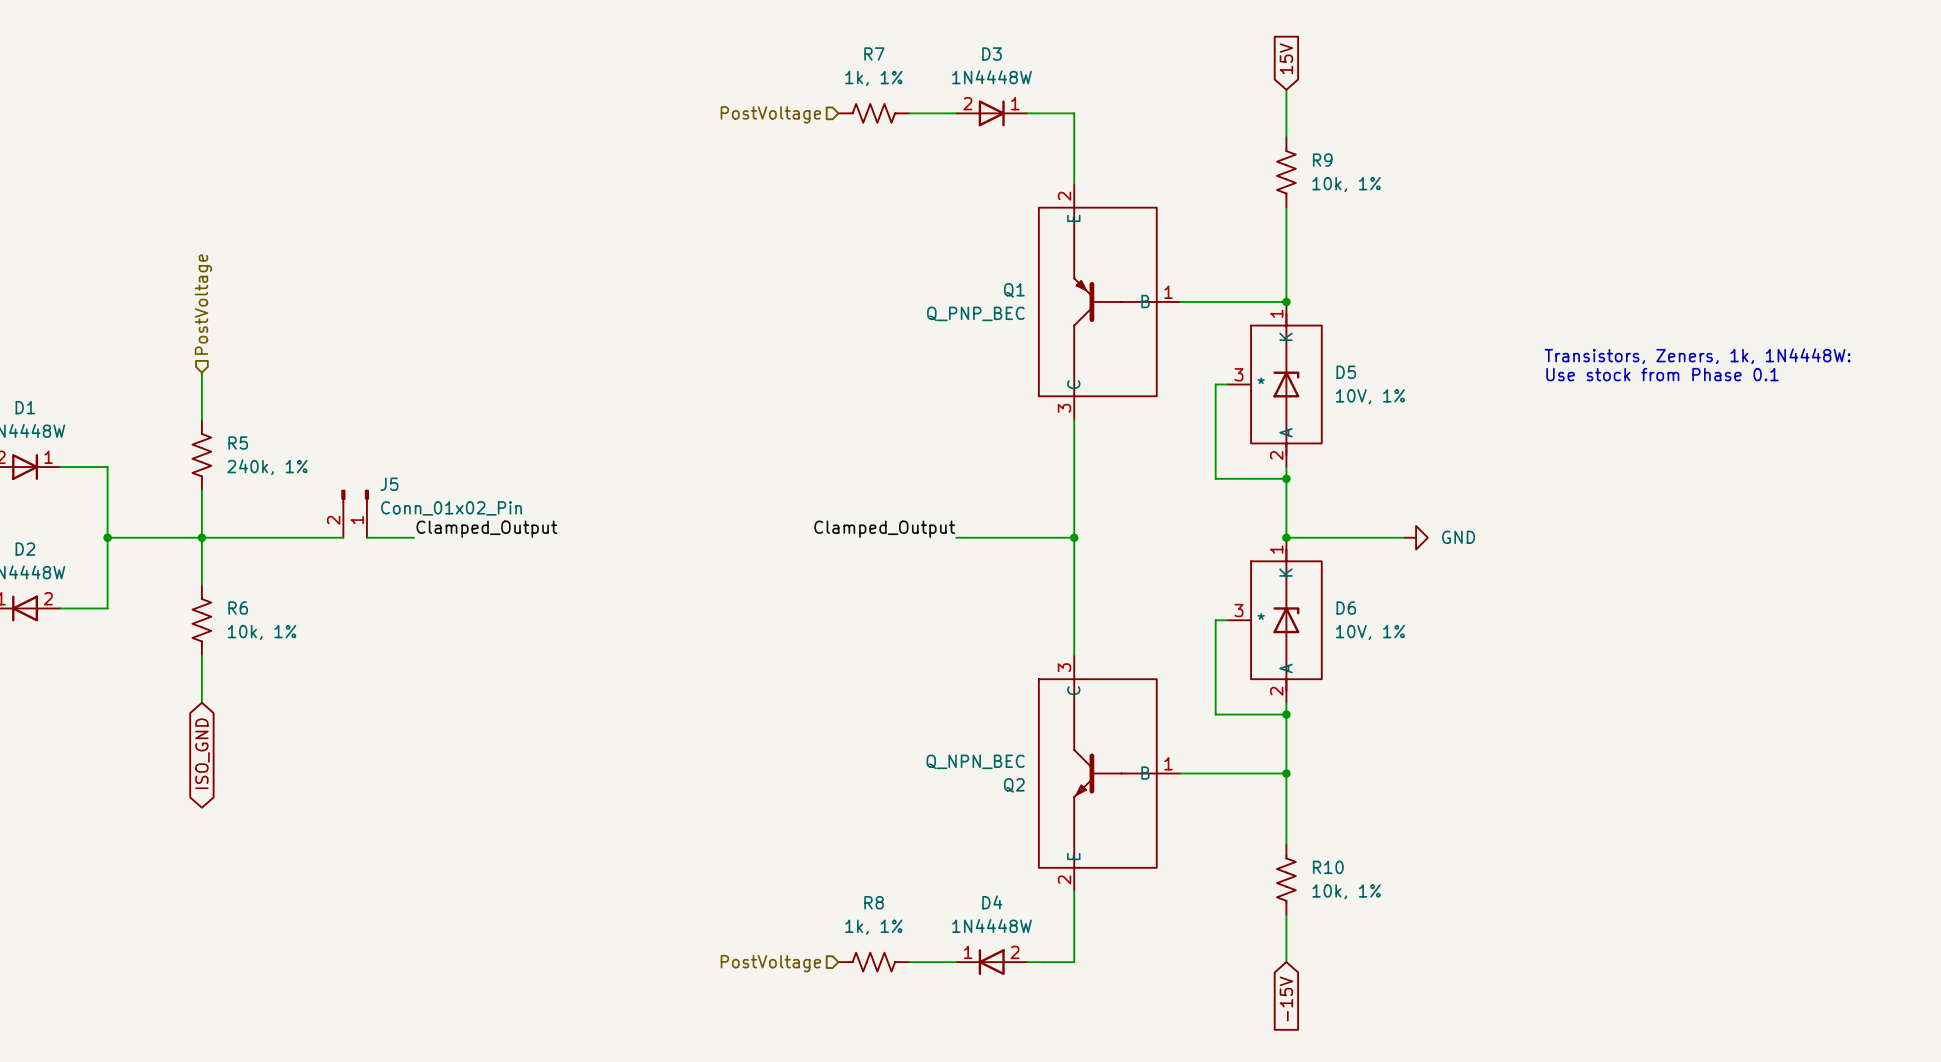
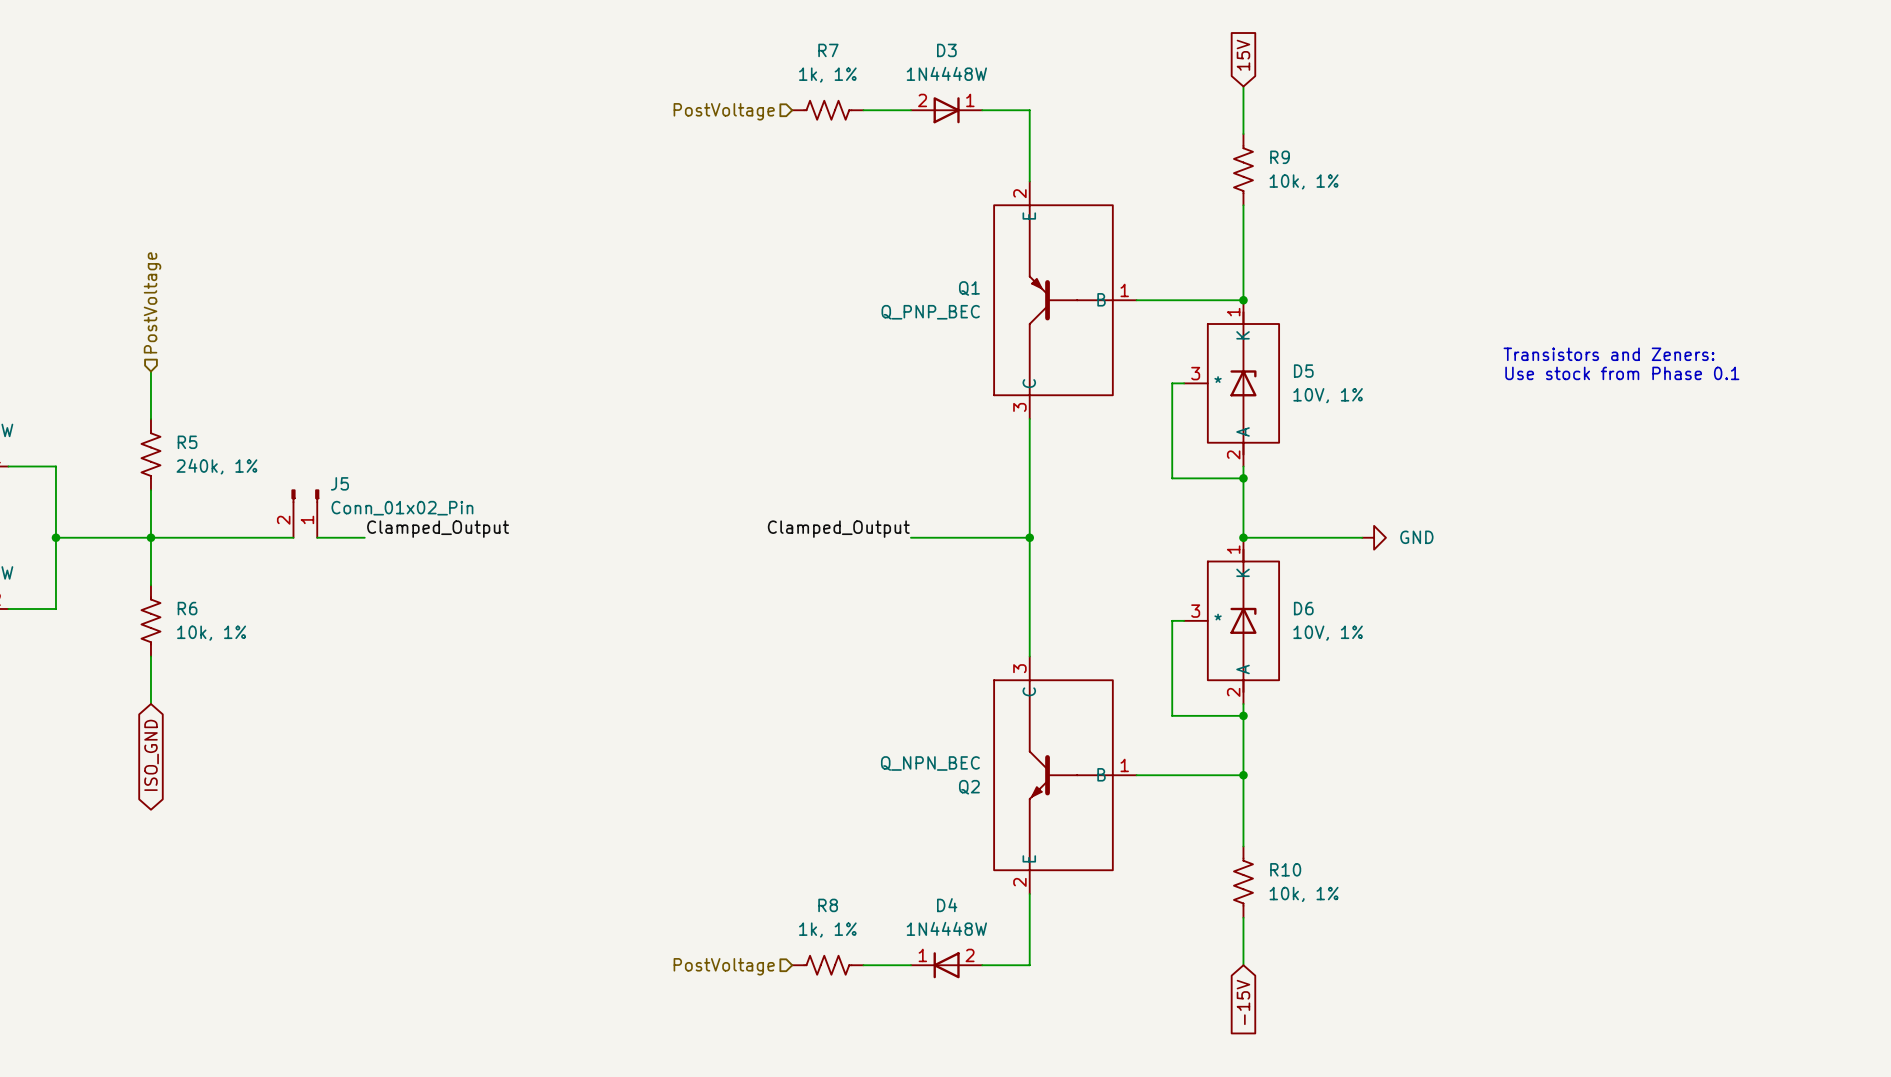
text: Transistors, Zeners, 1k, 1N4448W: (1697, 356) -> Transistors and Zeners: (1609, 354)

